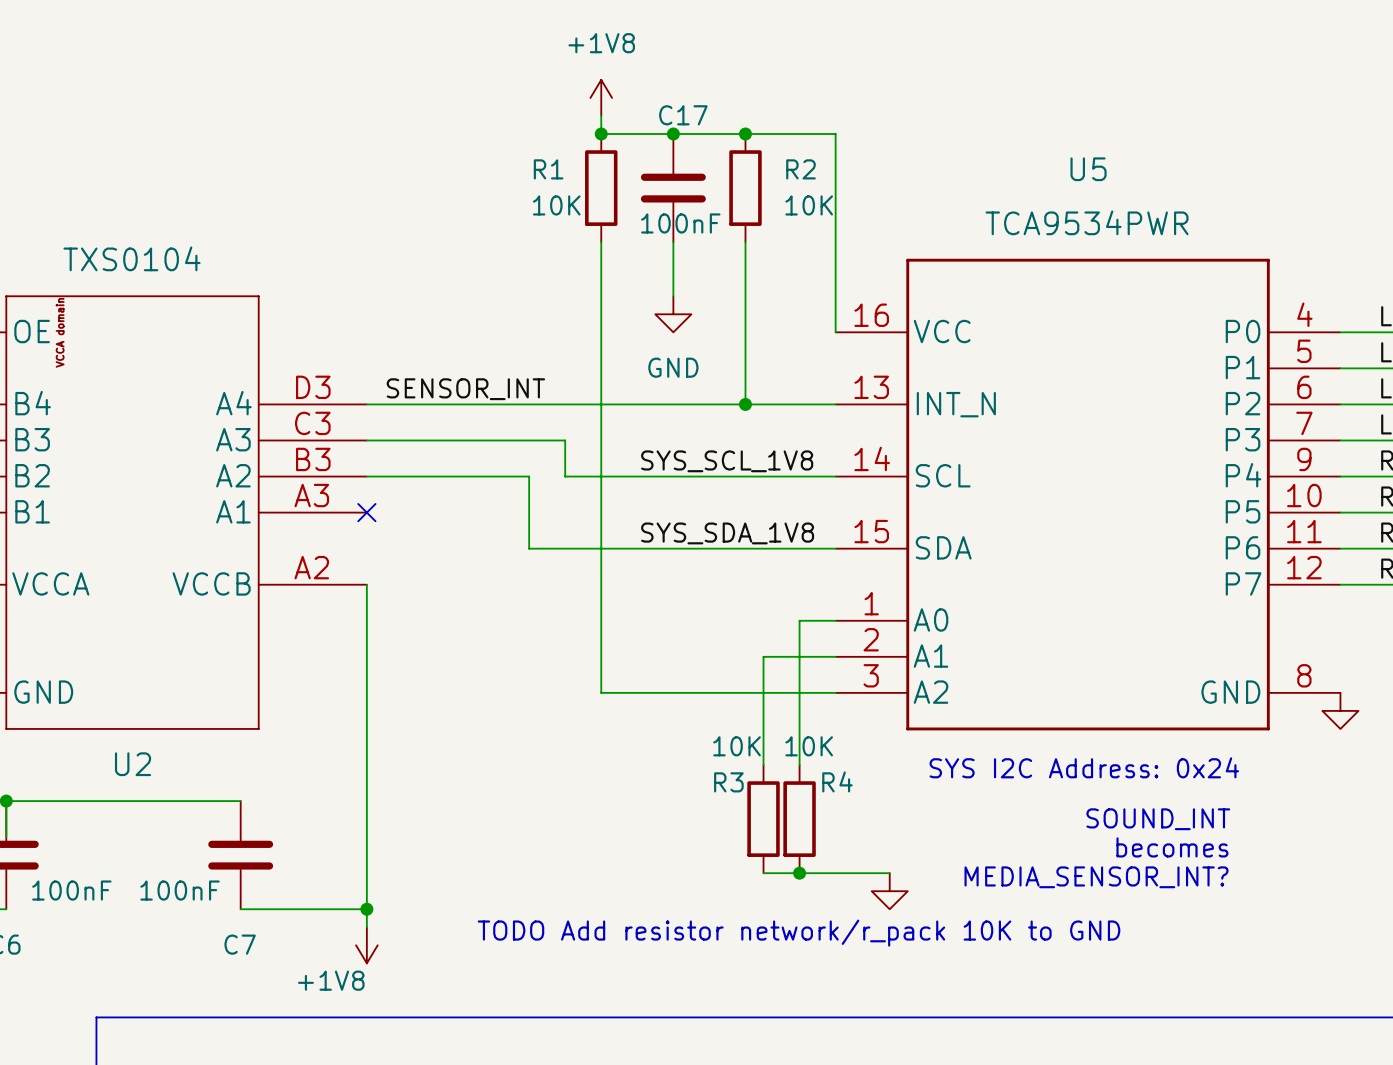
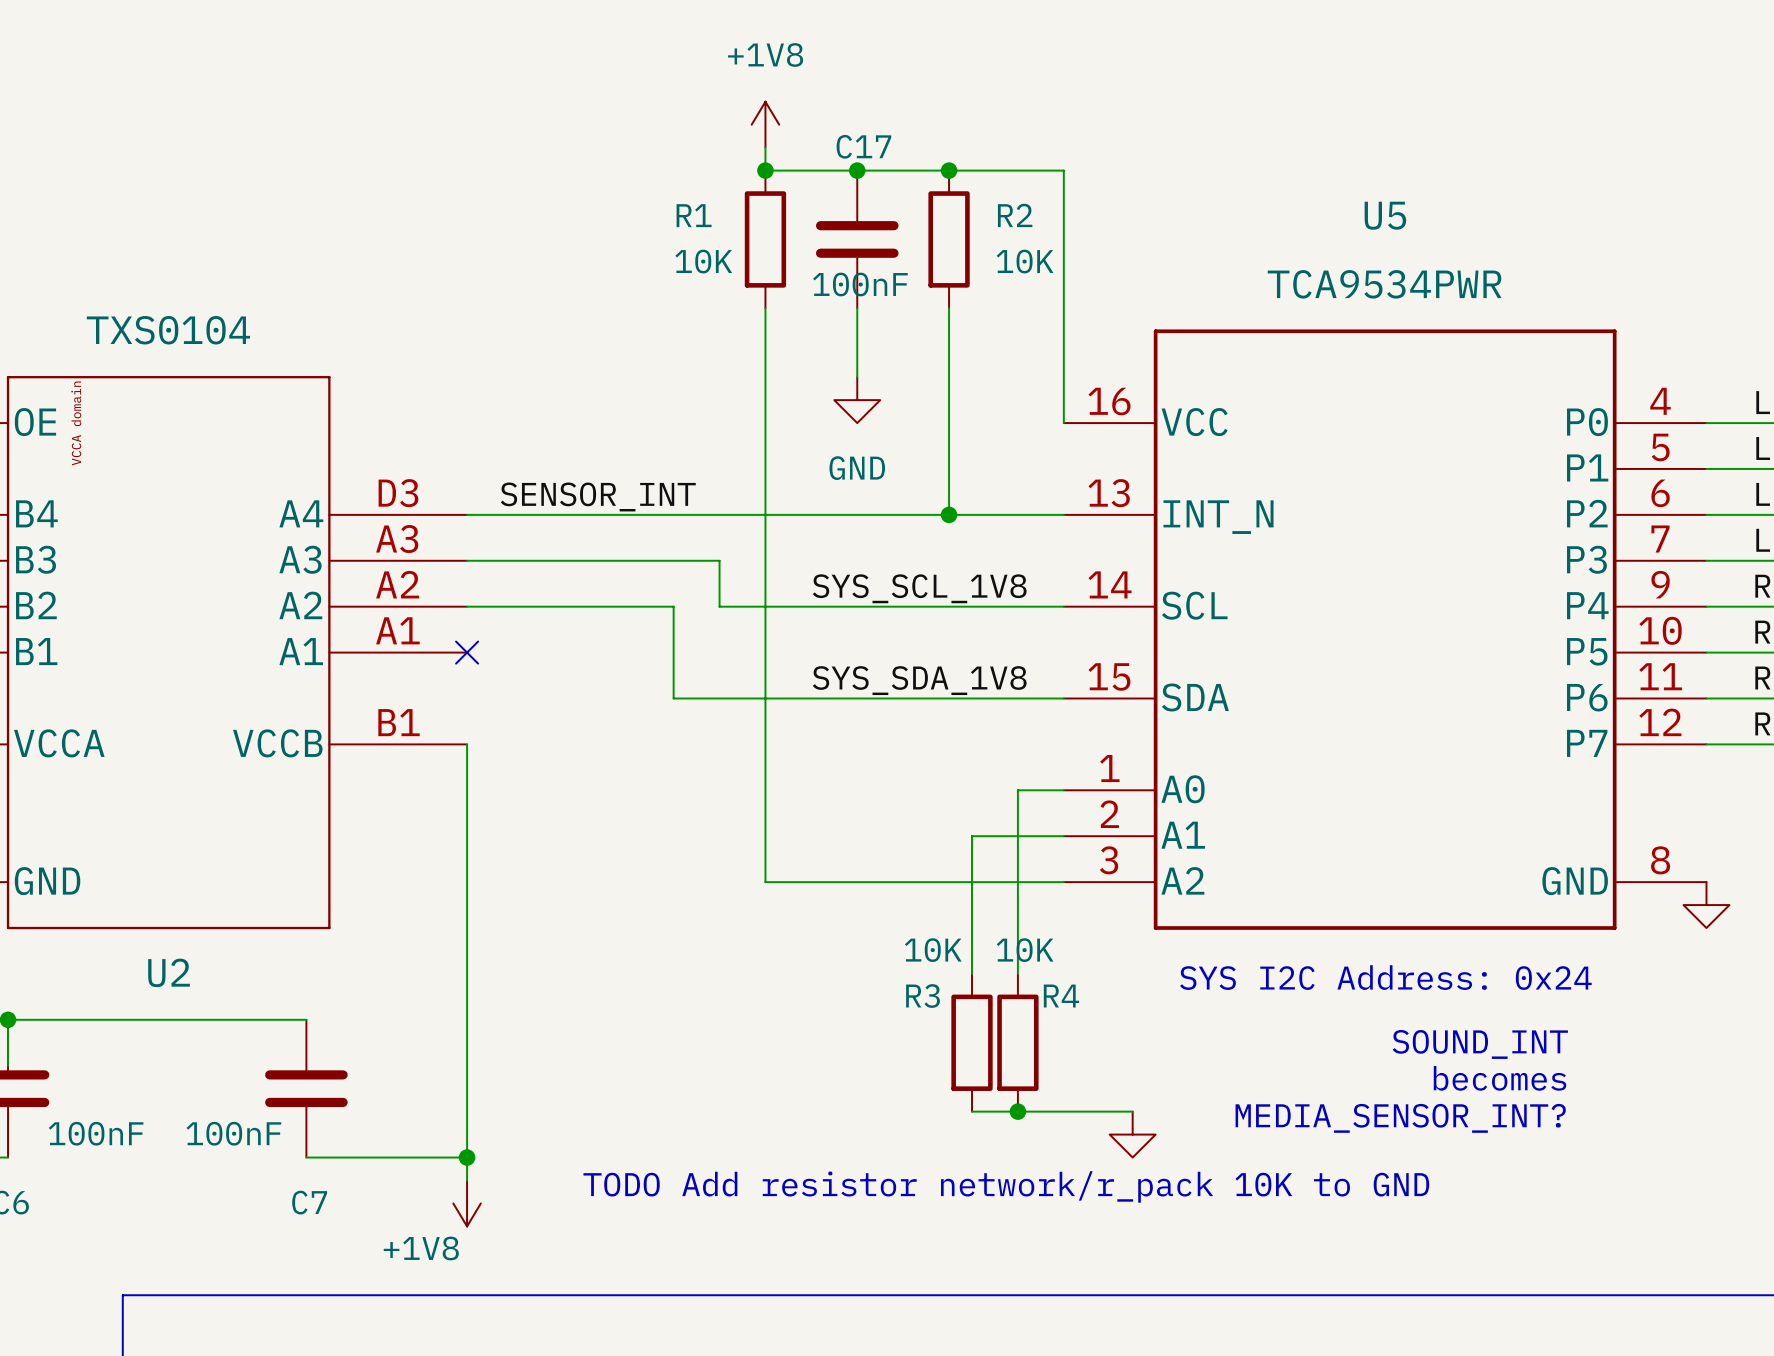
U2 pin number: C3 (312, 423) -> A3 (397, 539)
U2 pin number: B3 (313, 459) -> A2 (397, 584)
U2 pin number: A3 (311, 495) -> A1 (397, 630)
U2 pin number: A2 (311, 567) -> B1 (399, 722)

